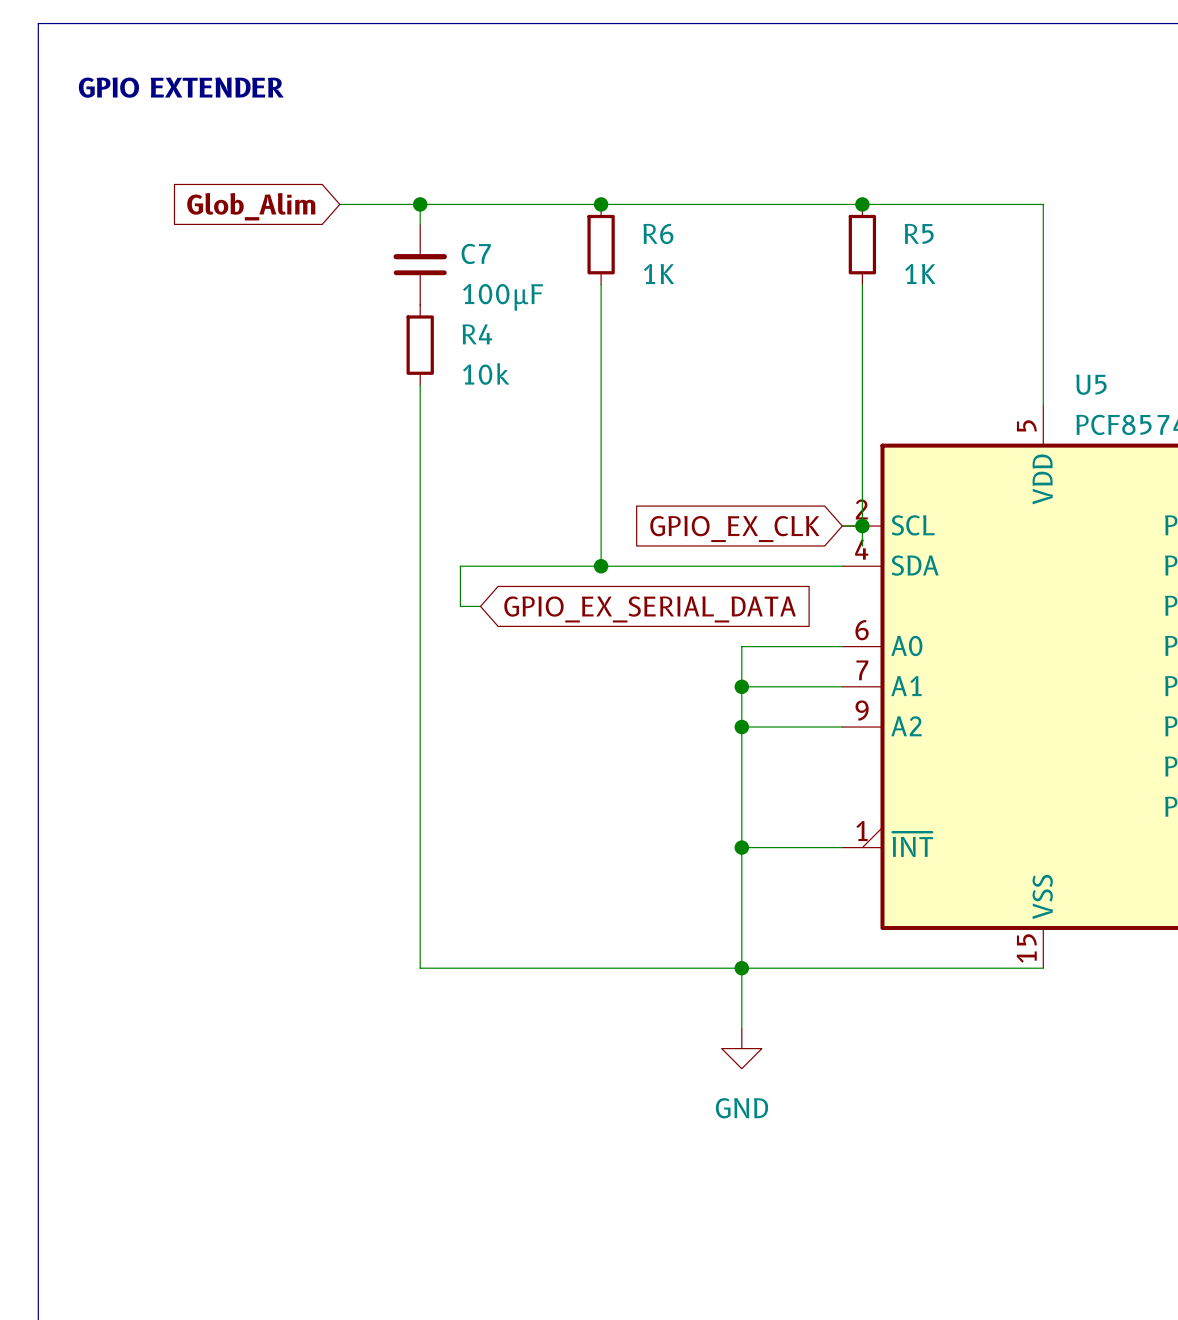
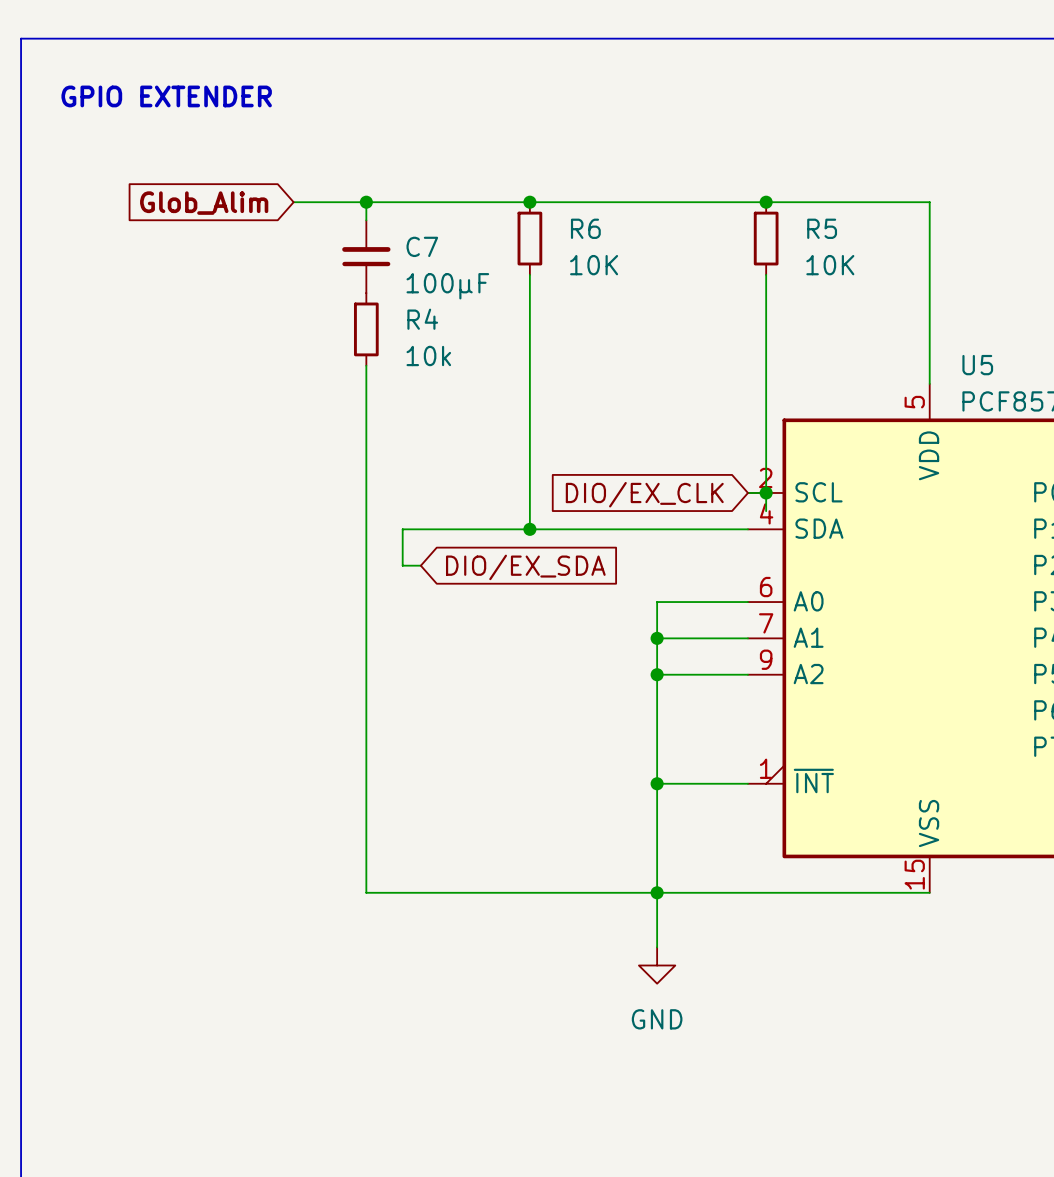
R6 value: 1K (659, 274) -> 10K (594, 265)
R5 value: 1K (920, 274) -> 10K (830, 265)
global label: GPIO_EX_CLK (734, 529) -> DIO/EX_CLK (644, 494)
global label: GPIO_EX_SERIAL_DATA (650, 609) -> DIO/EX_SDA (525, 567)

